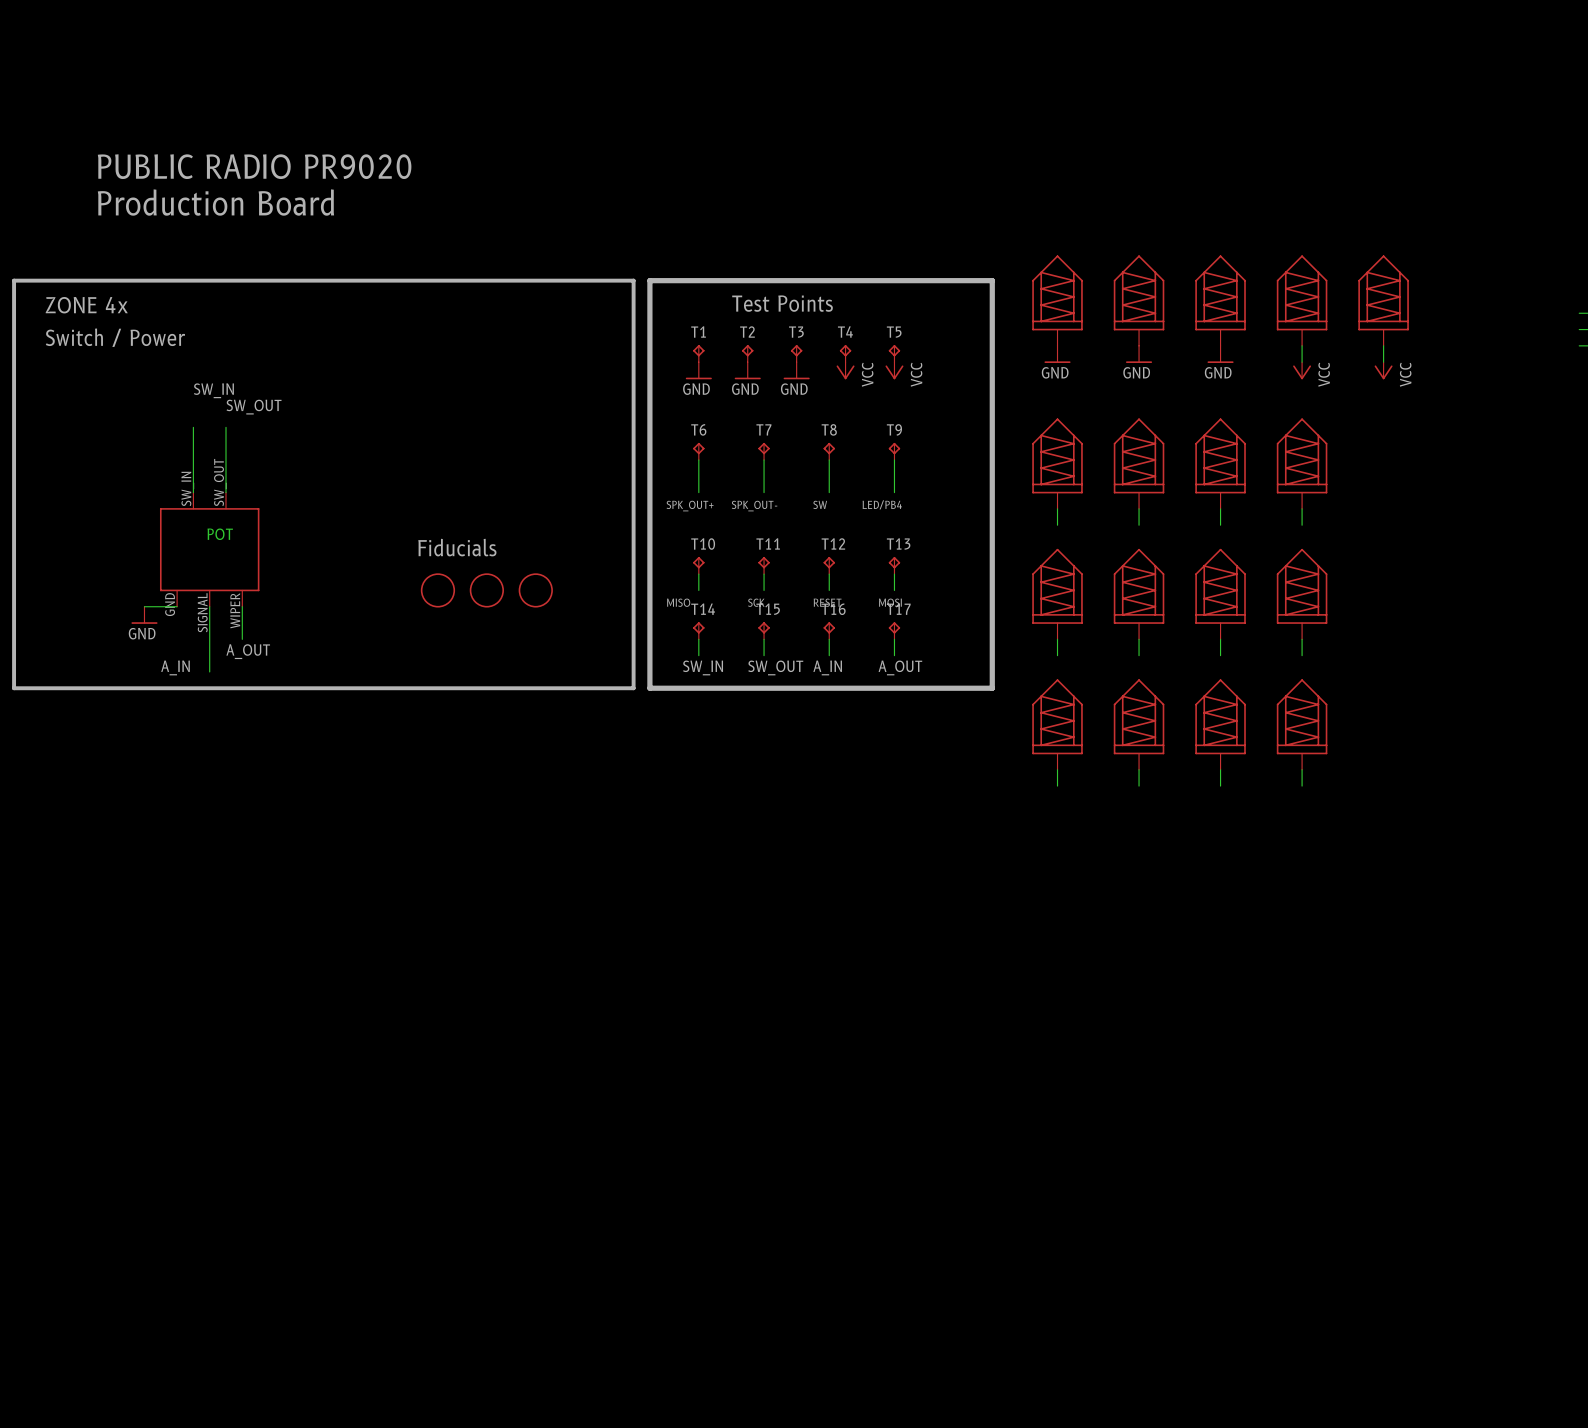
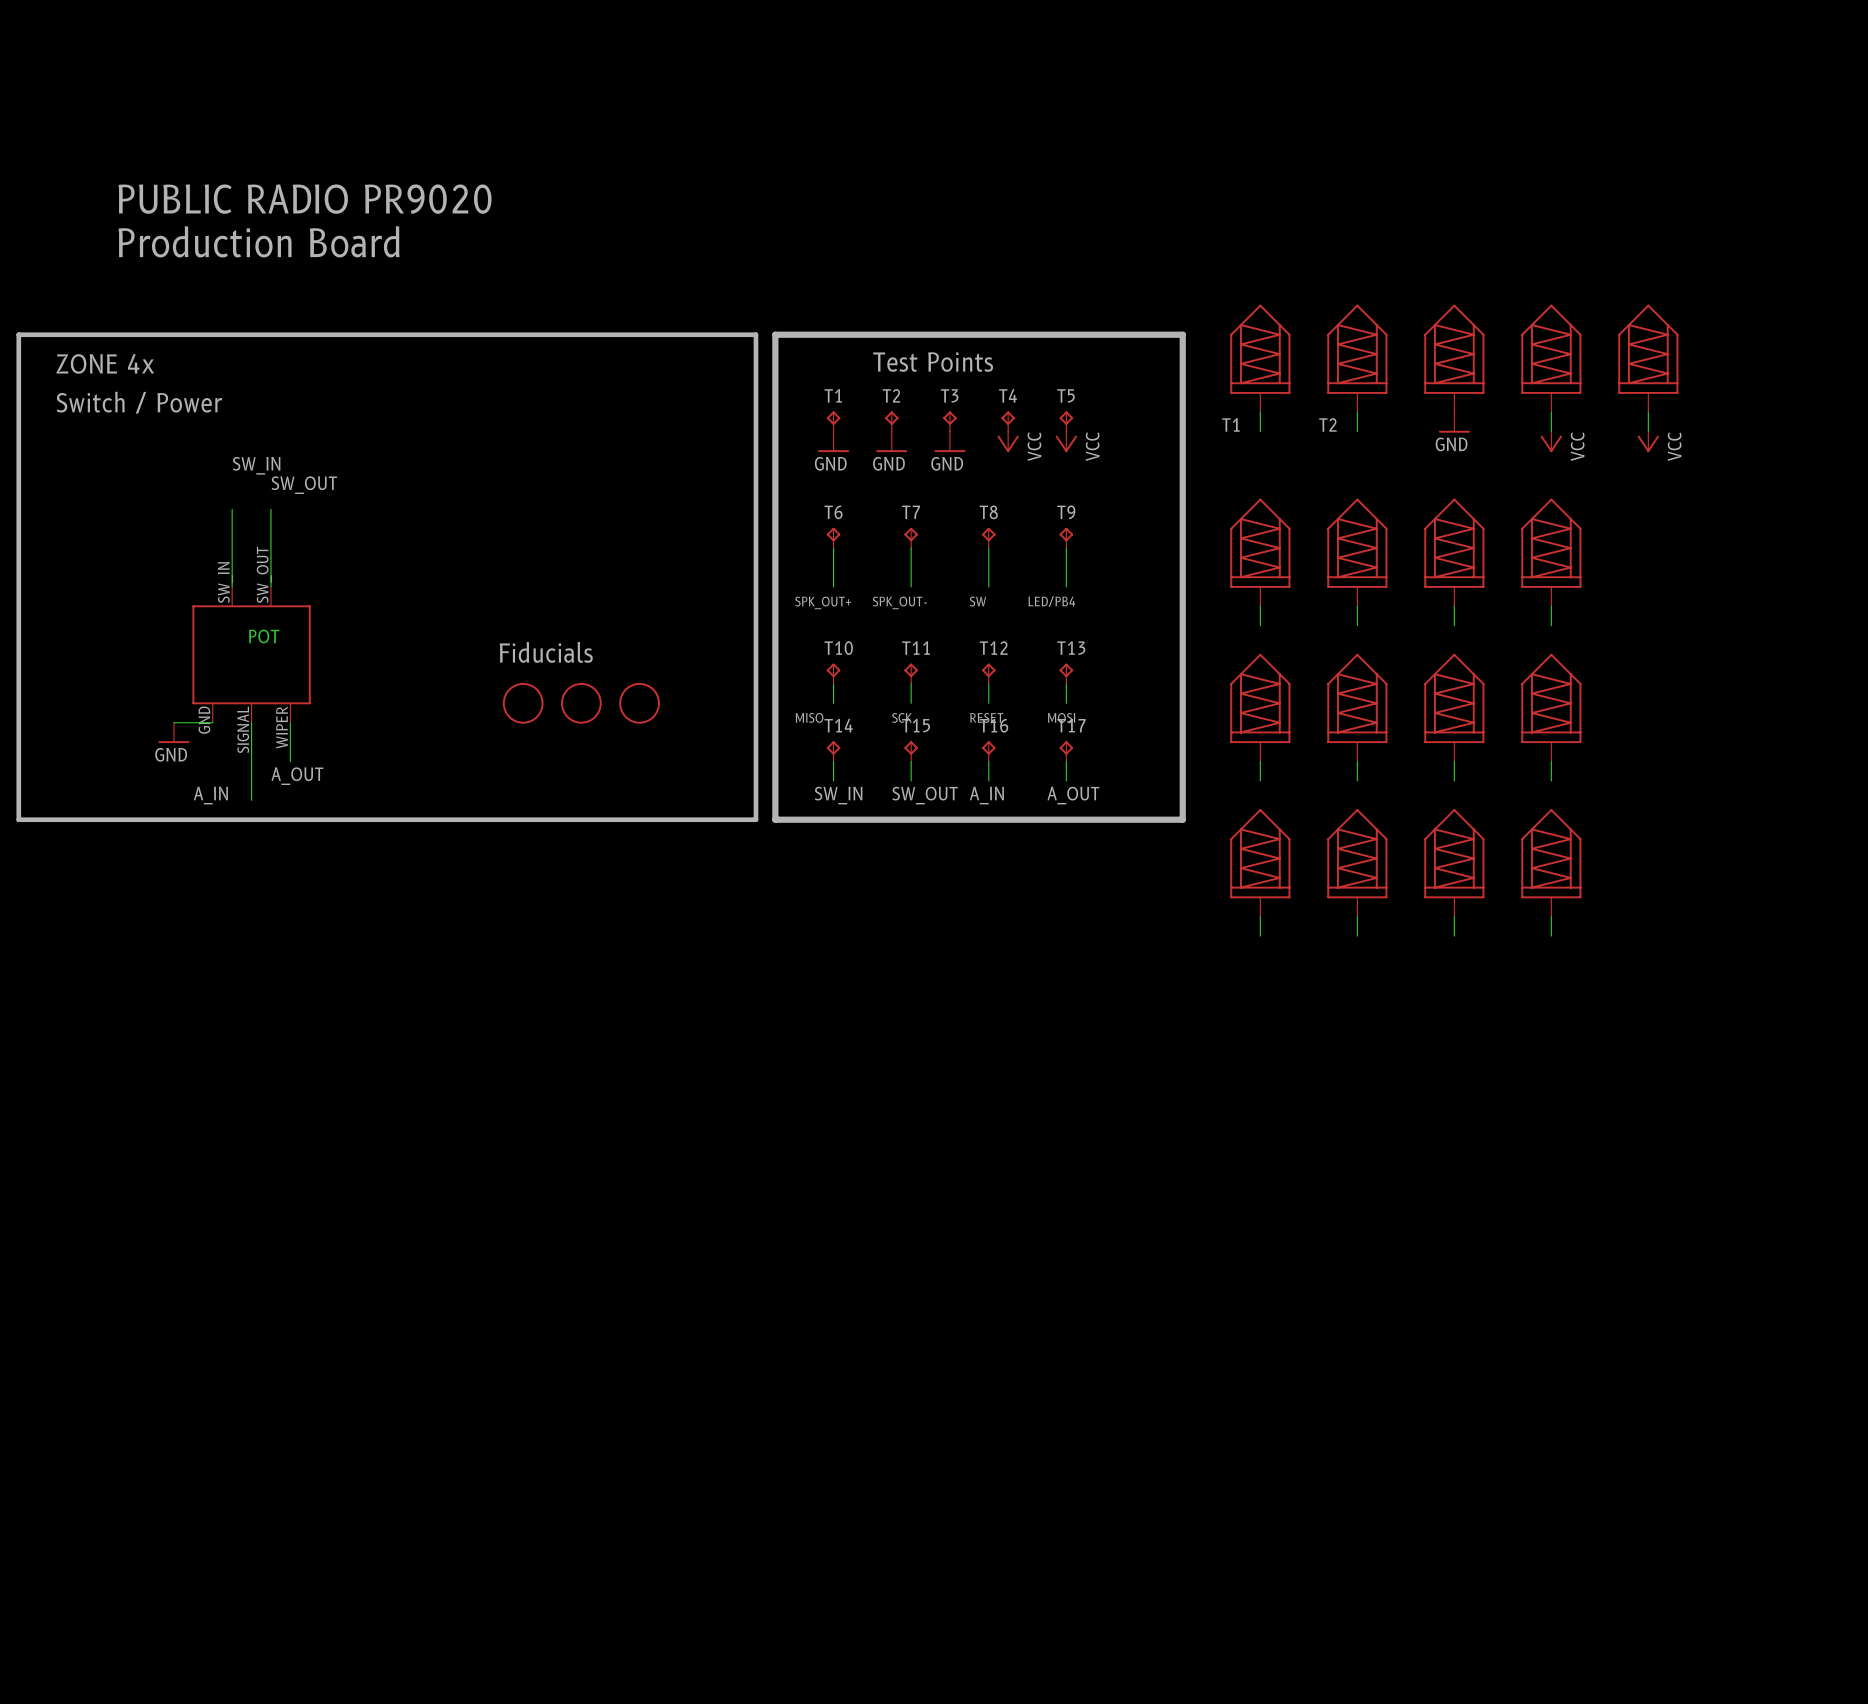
power symbol: GND (1057, 354) -> none
power symbol: GND (1139, 354) -> none
label: none -> T1 (1230, 424)
label: none -> T2 (1327, 424)

